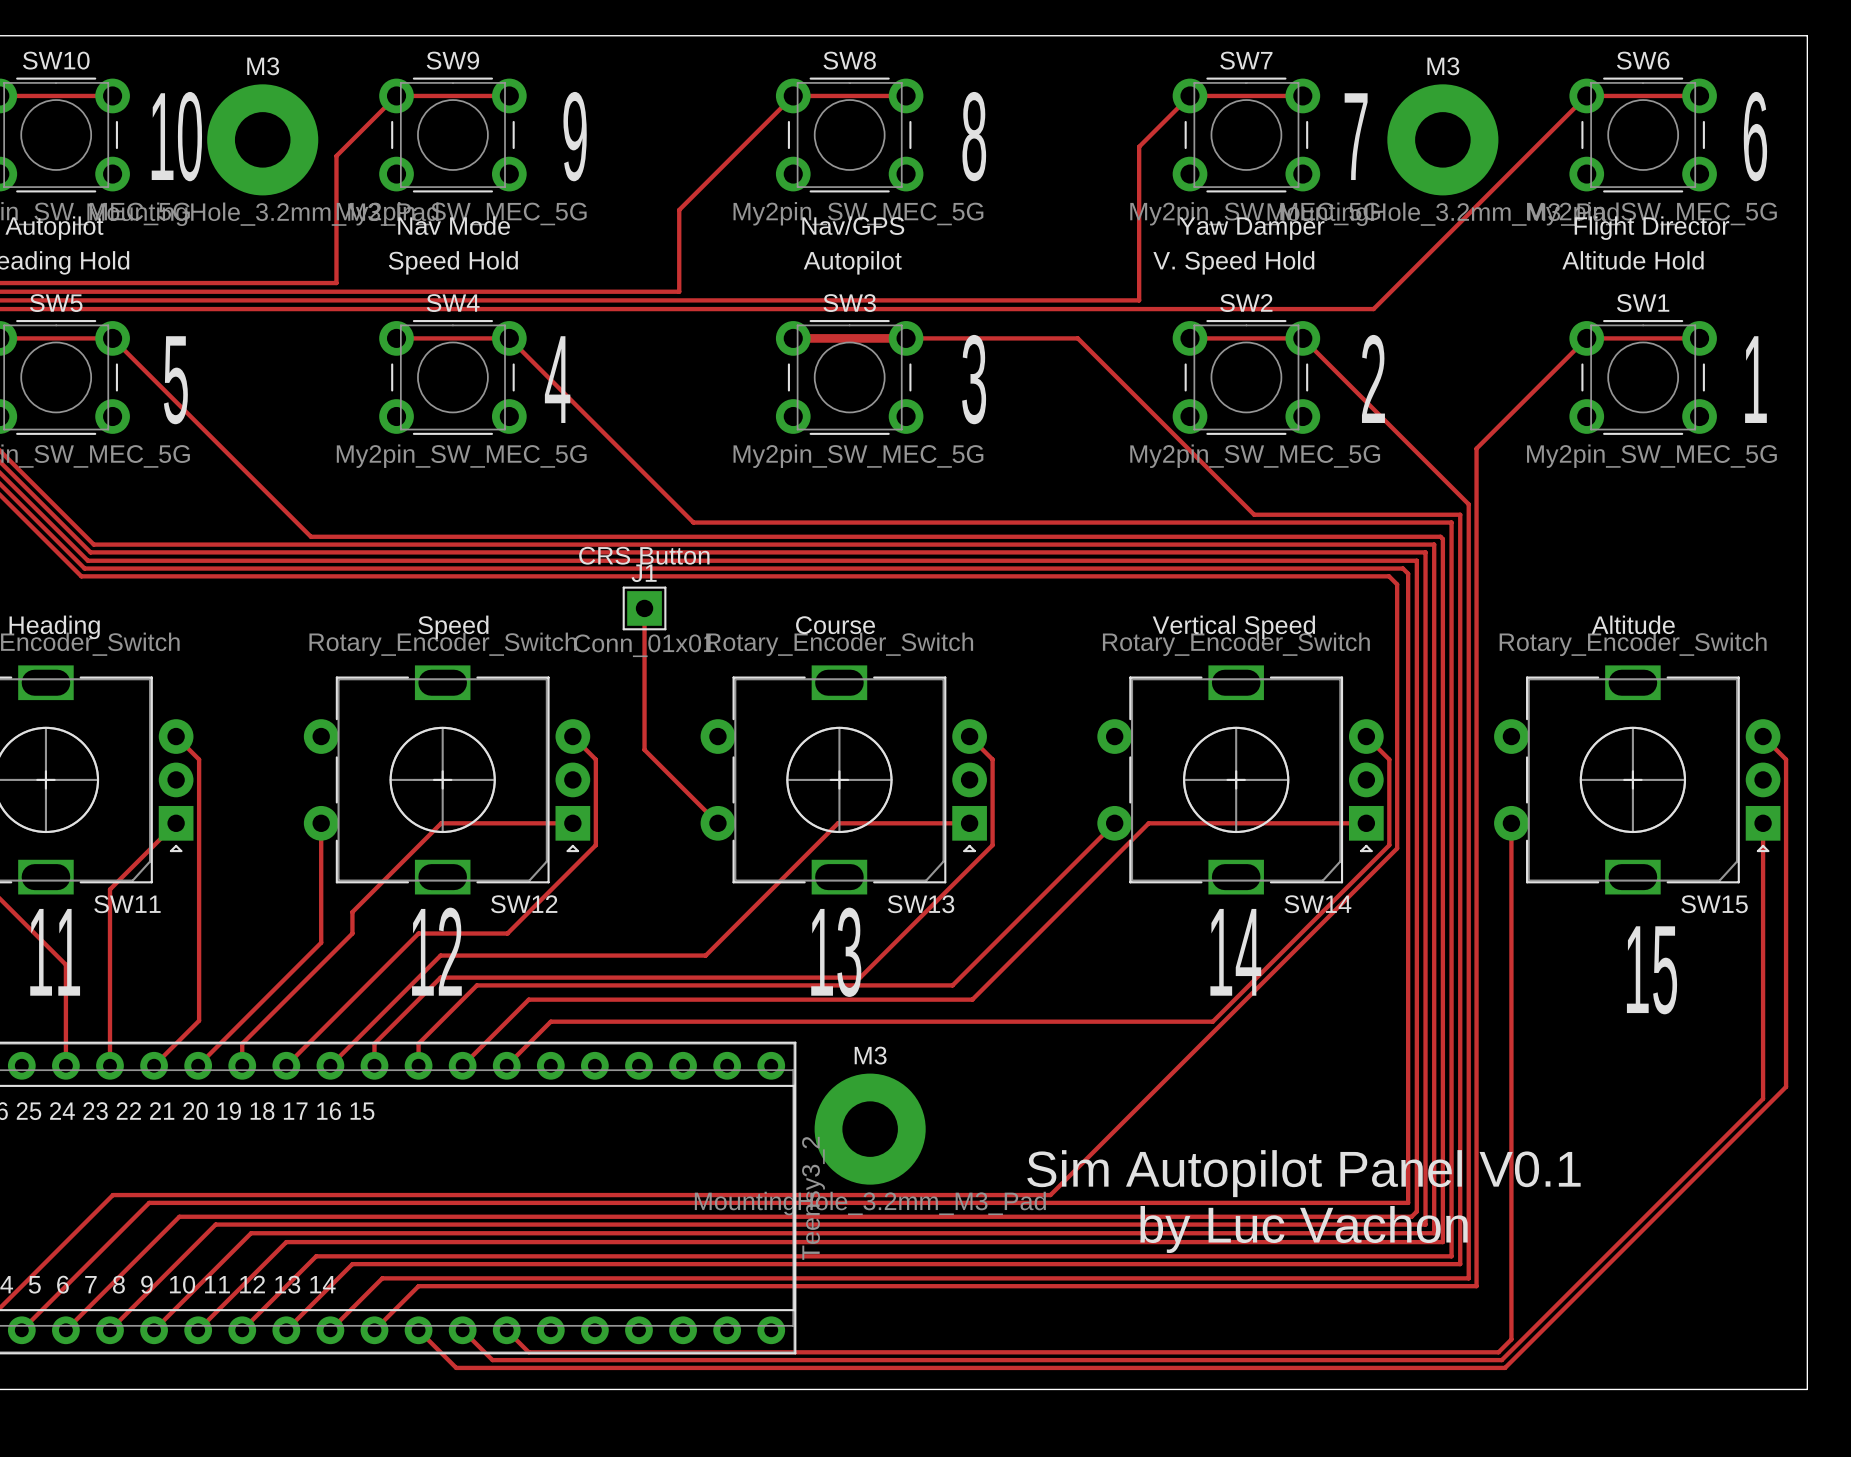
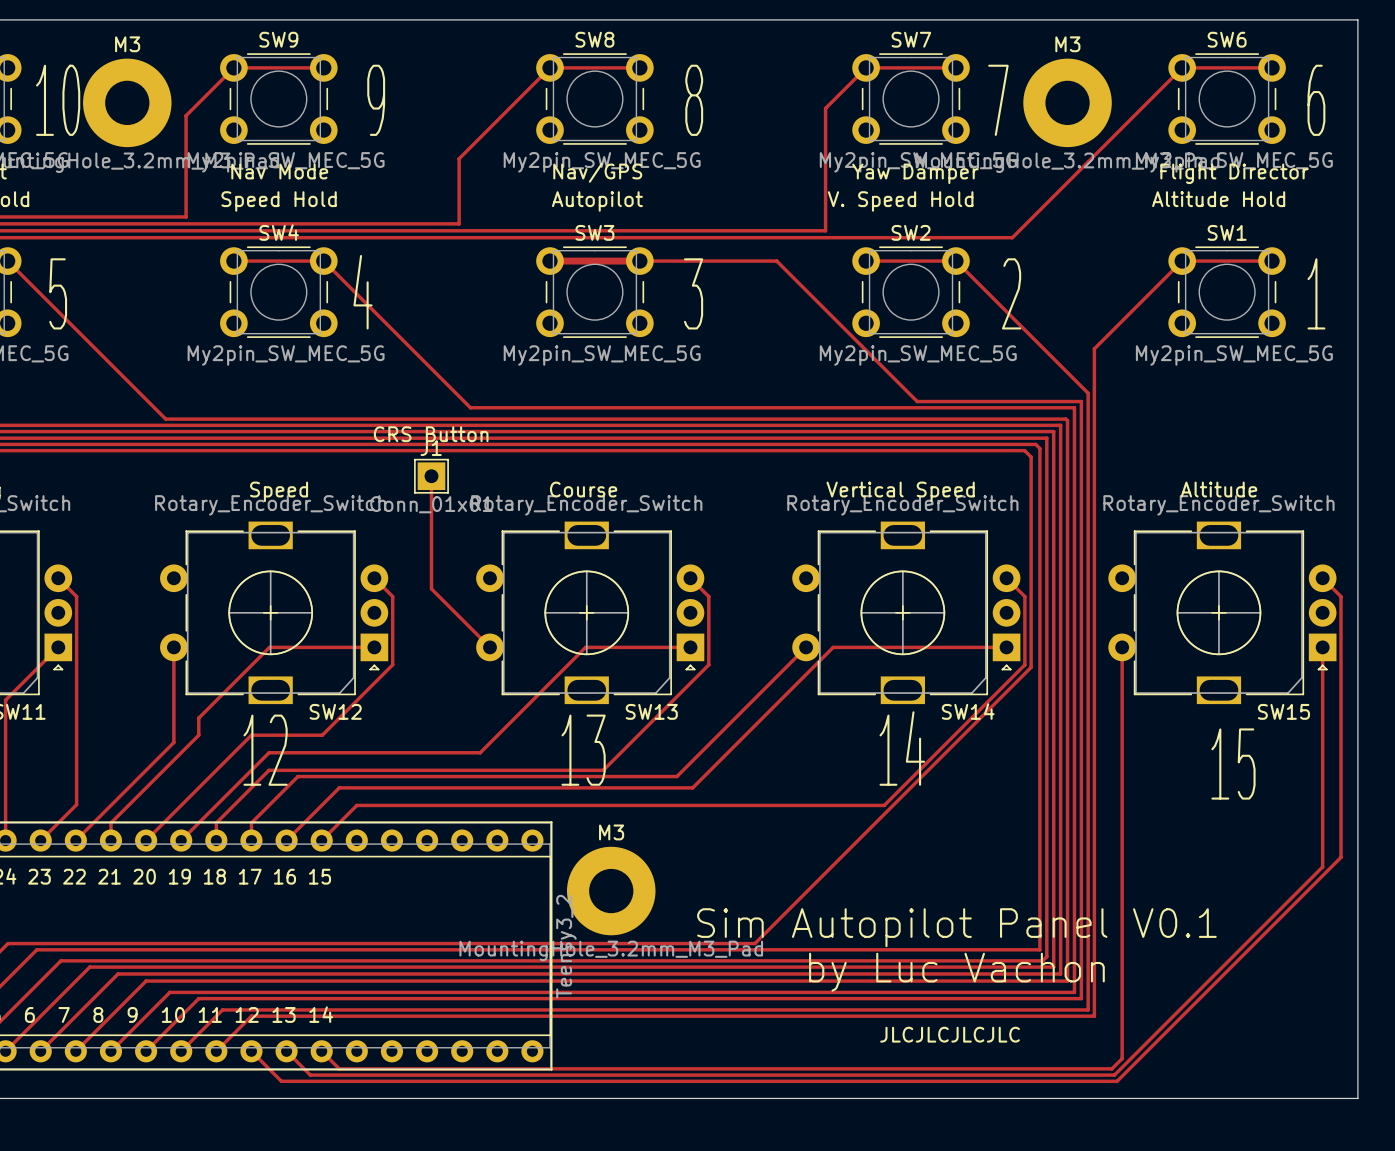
text: none -> JLCJLCJLCJLC (950, 1034)

